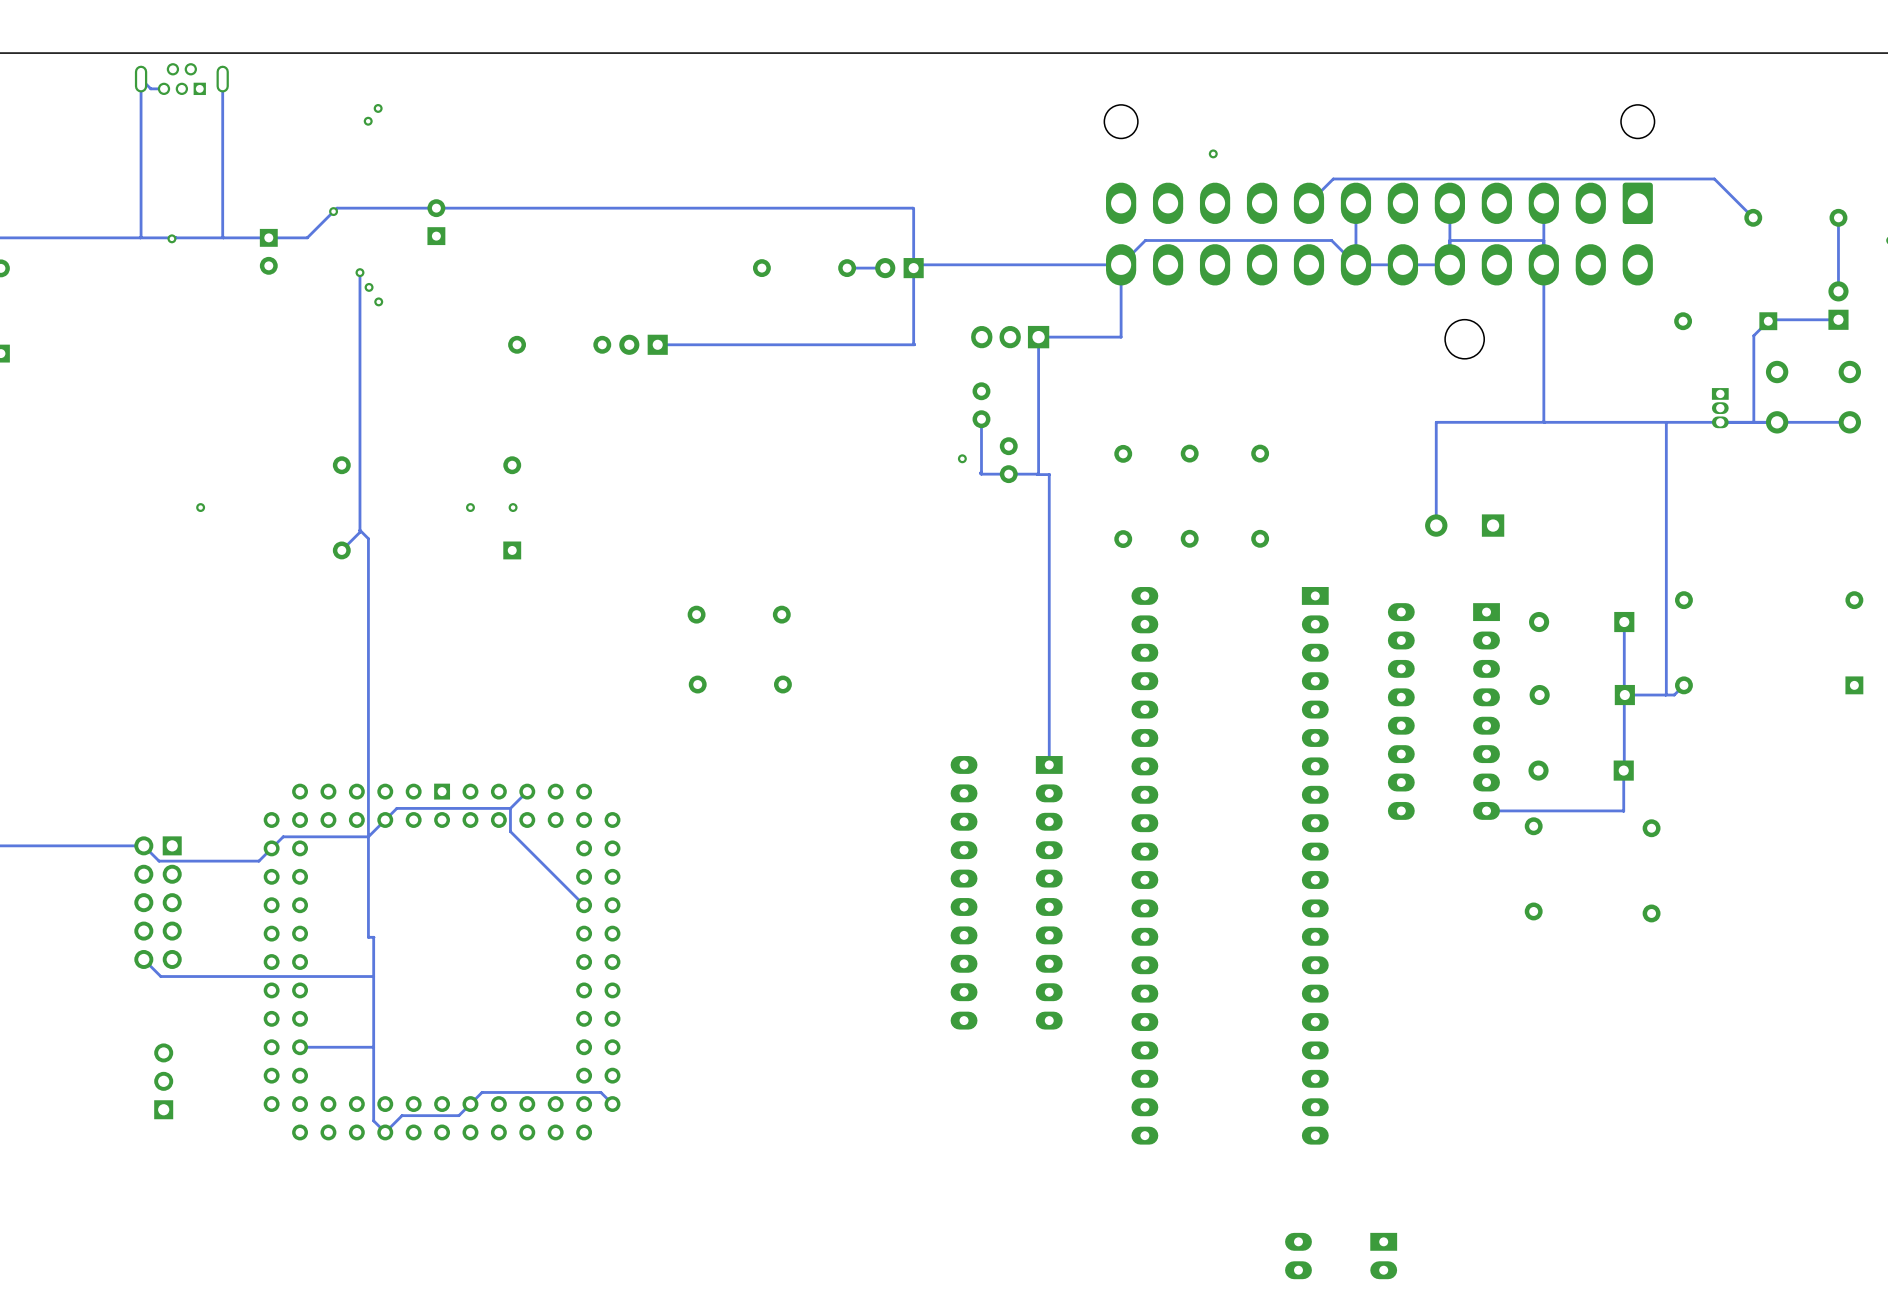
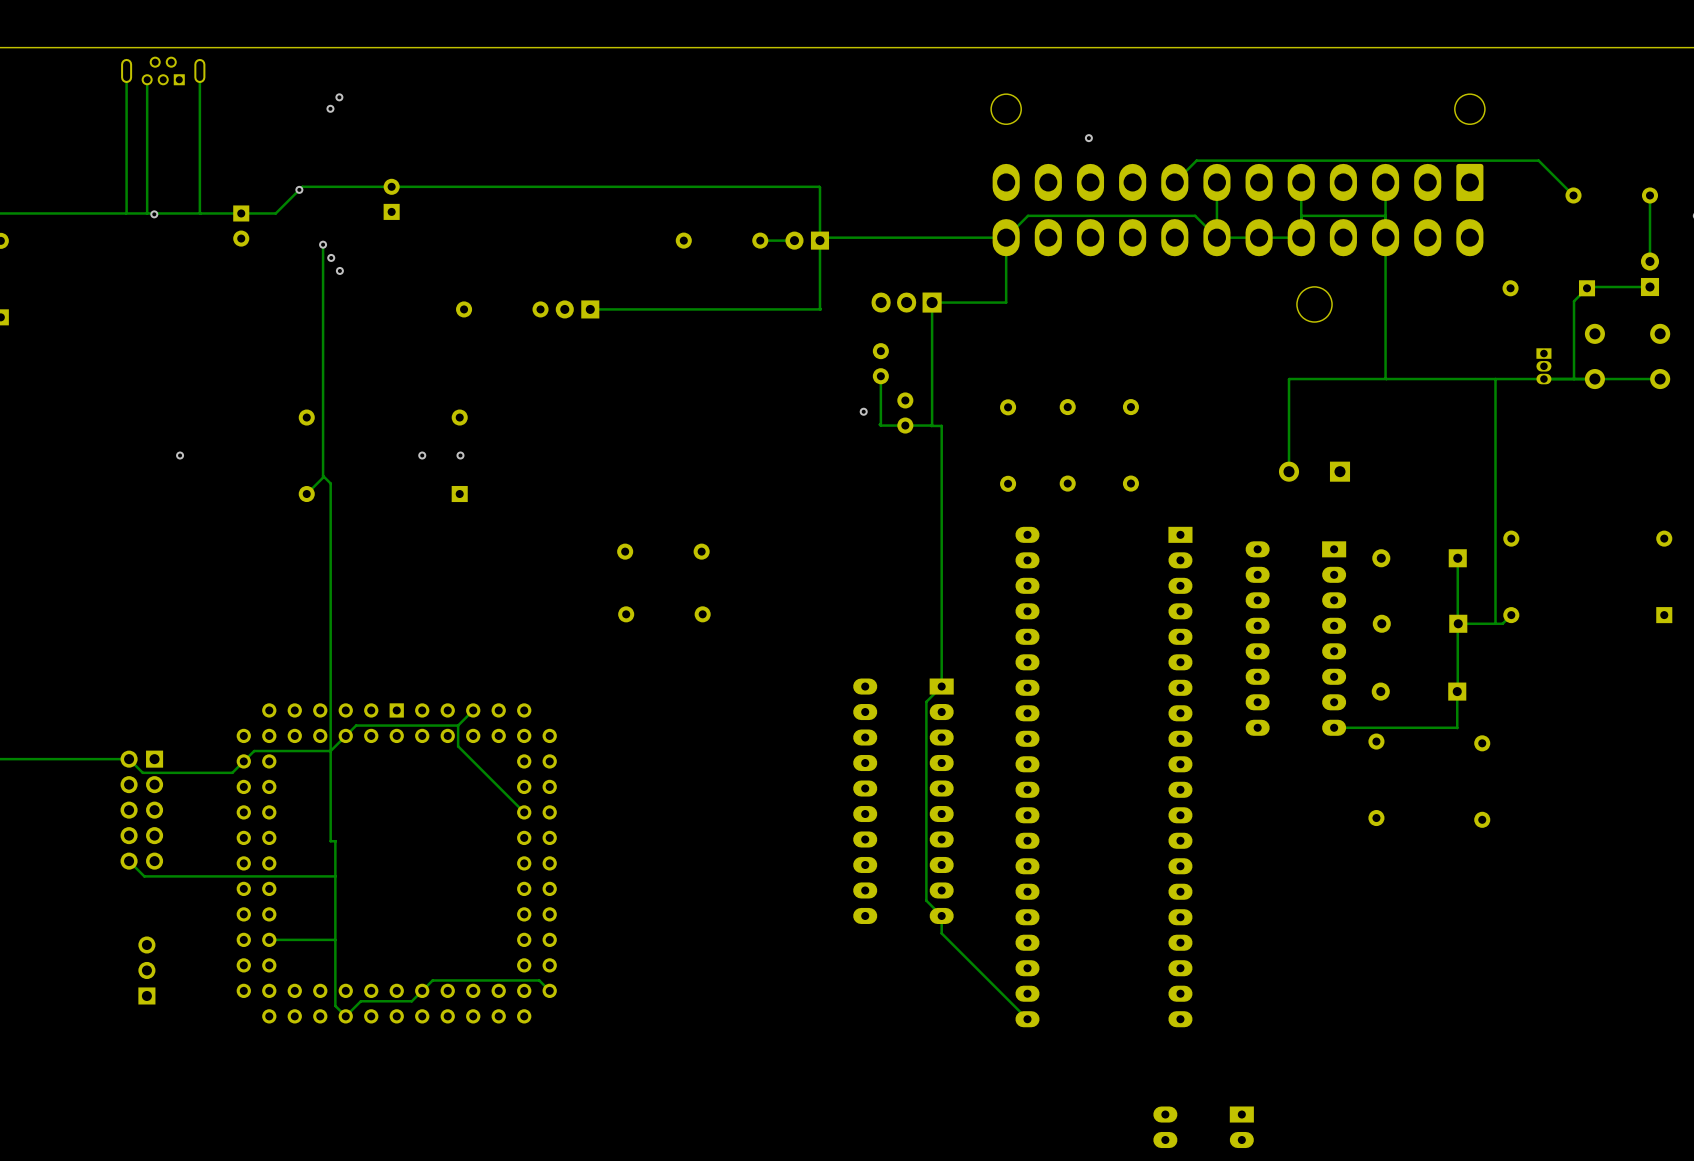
track: (141, 79) (150, 88) (163, 88) -> (146, 213) (147, 79)
track: none -> (941, 686) (926, 701) (926, 900) (941, 915) (941, 933) (1027, 1019)

